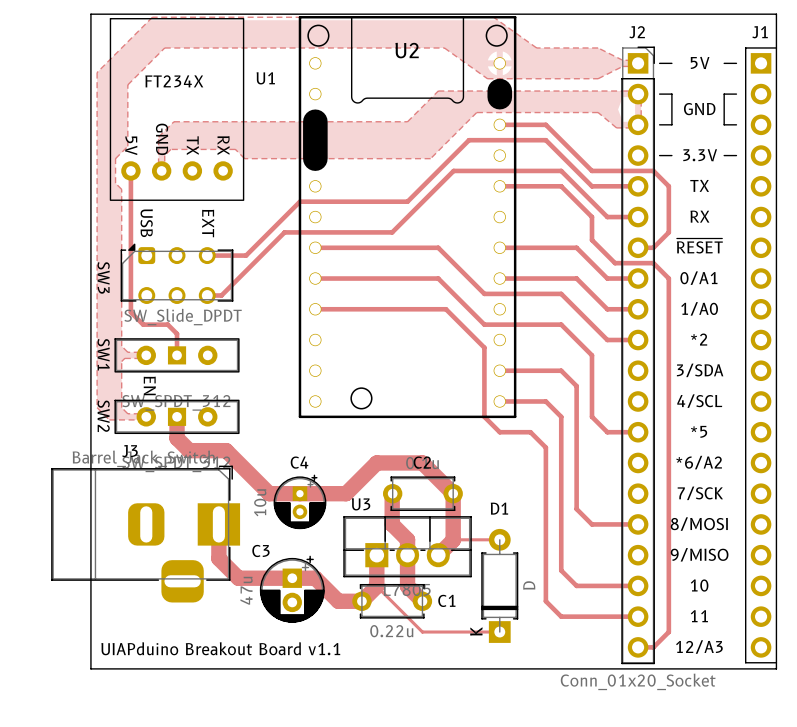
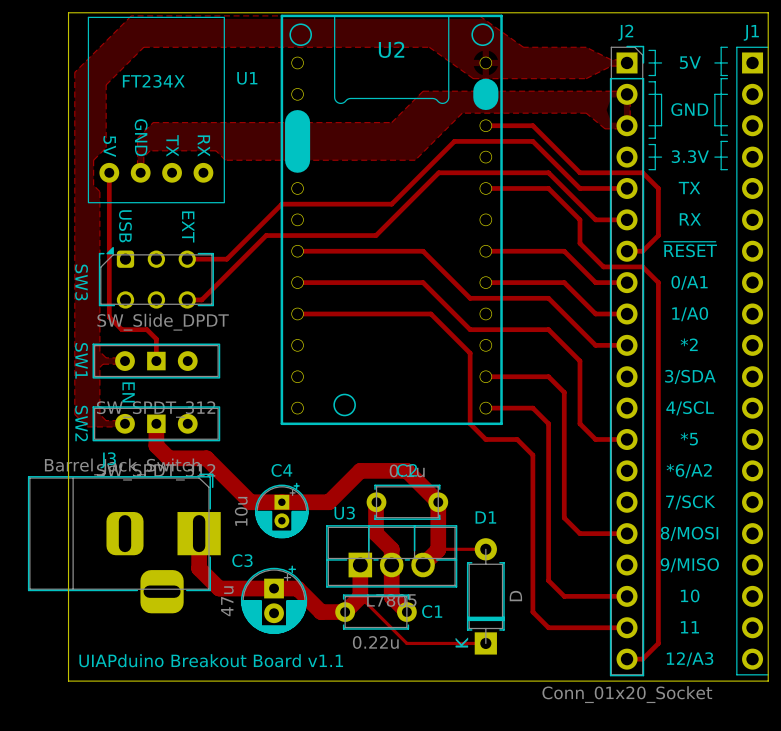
line: none -> (727, 47) (721, 47) (721, 75) (727, 75)
line: none -> (648, 50) (655, 50) (655, 75) (648, 75)
line: none -> (727, 78) (721, 78) (721, 135) (727, 135)
line: none -> (648, 81) (655, 81) (655, 138) (648, 138)
line: none -> (727, 141) (721, 141) (721, 169) (727, 169)
line: none -> (648, 144) (655, 144) (655, 169) (648, 169)

